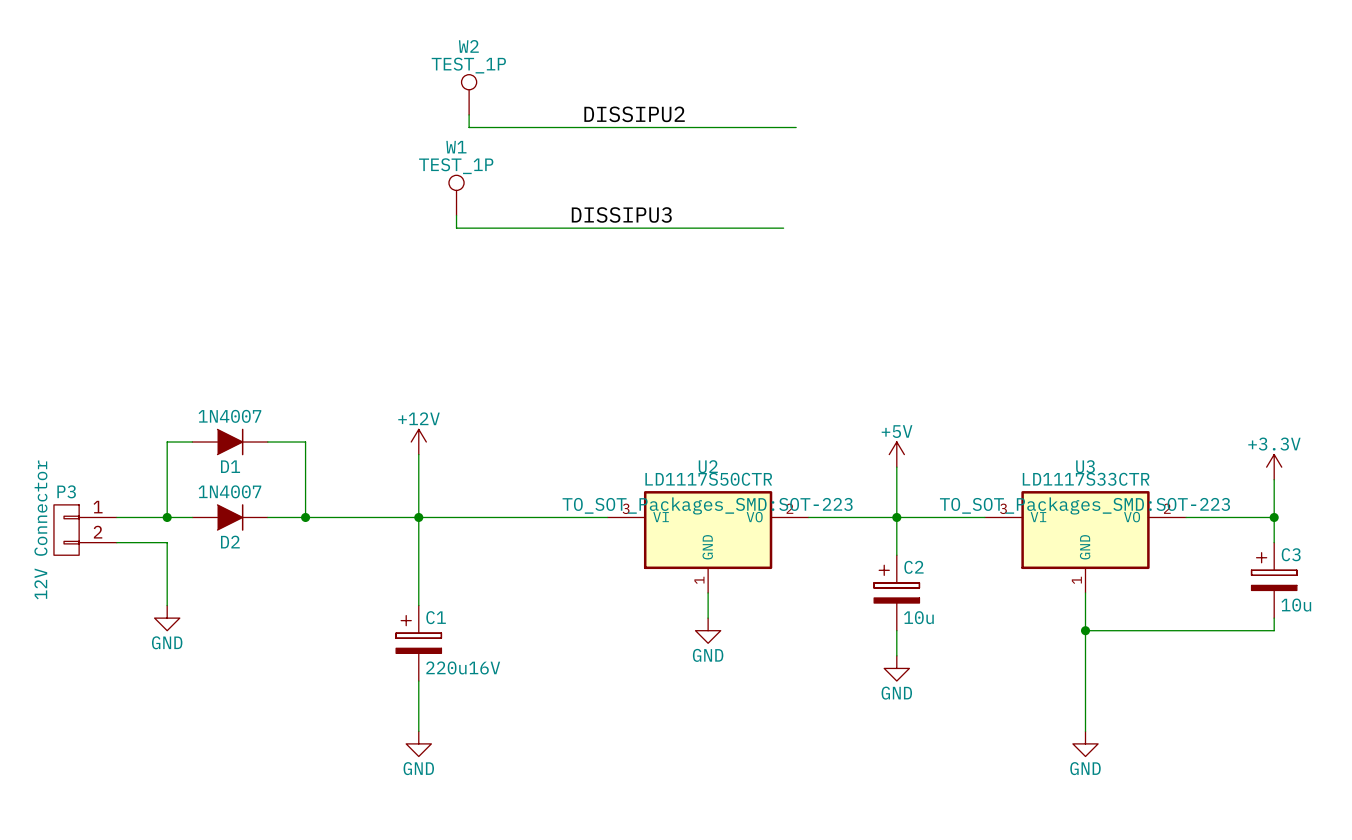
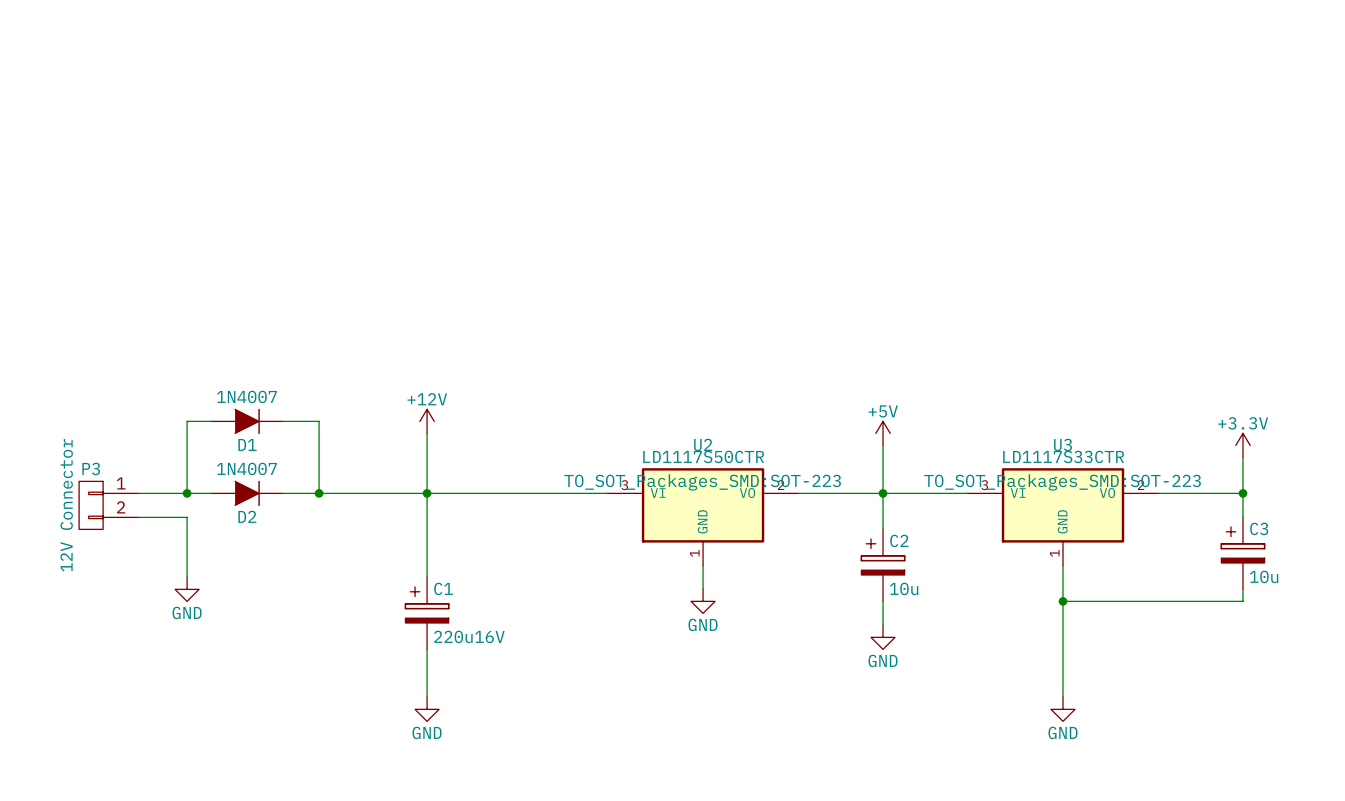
W2: TEST_1P (469, 94) -> none
wire: (469, 114) (469, 127) (796, 127) -> none
label: DISSIPU2 (634, 114) -> none
W1: TEST_1P (456, 195) -> none
label: DISSIPU3 (621, 214) -> none
wire: (456, 215) (456, 228) (783, 228) -> none

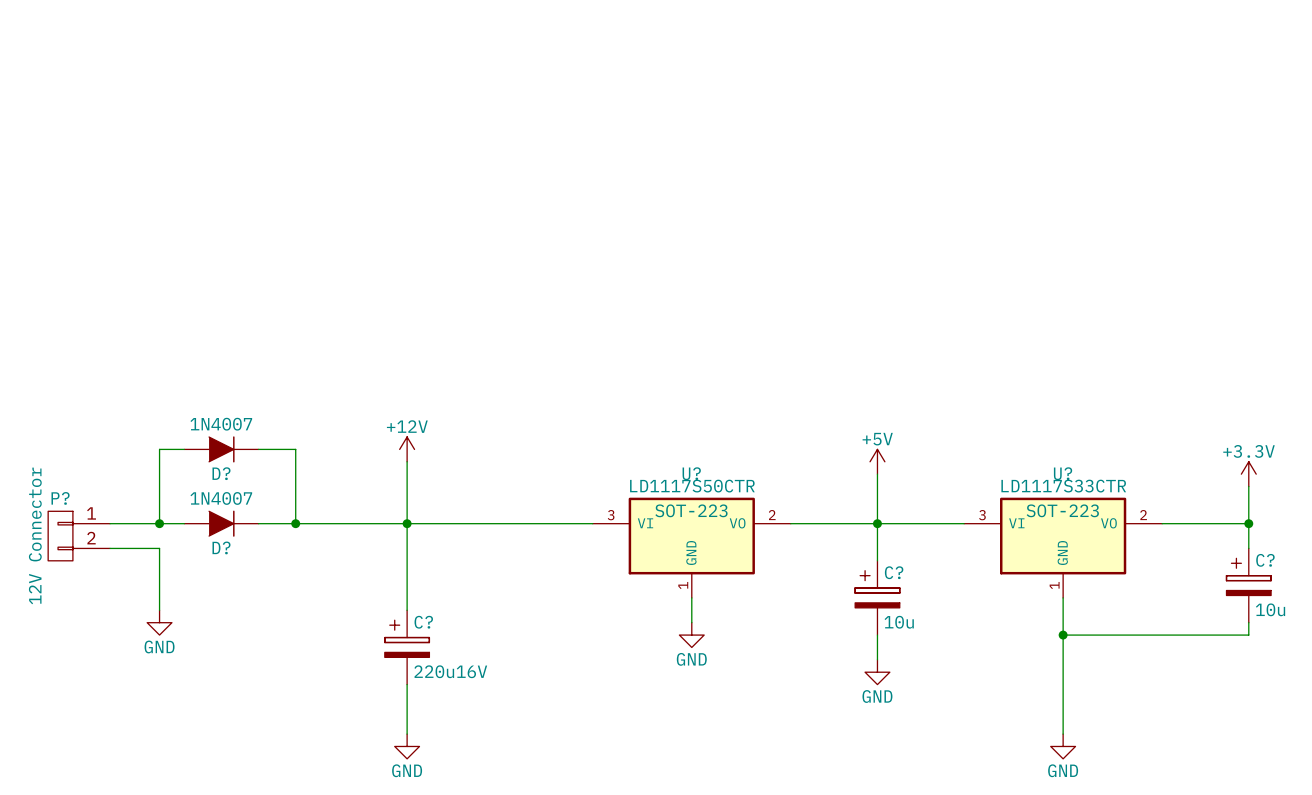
D1 name: D1 (247, 444) -> D? (221, 473)
U2 name: U2 (703, 444) -> U? (691, 473)
U3 name: U3 (1062, 444) -> U? (1063, 473)
P3 name: P3 (91, 468) -> P? (60, 498)
U2 text: TO_SOT_Packages_SMD:SOT-223 (702, 482) -> SOT-223 (691, 510)
U3 text: TO_SOT_Packages_SMD:SOT-223 (1062, 482) -> SOT-223 (1062, 510)
D2 name: D2 (247, 516) -> D? (221, 547)
C3 name: C3 (1259, 528) -> C? (1265, 560)
C2 name: C2 (899, 540) -> C? (894, 572)
C1 name: C1 (443, 588) -> C? (423, 622)

